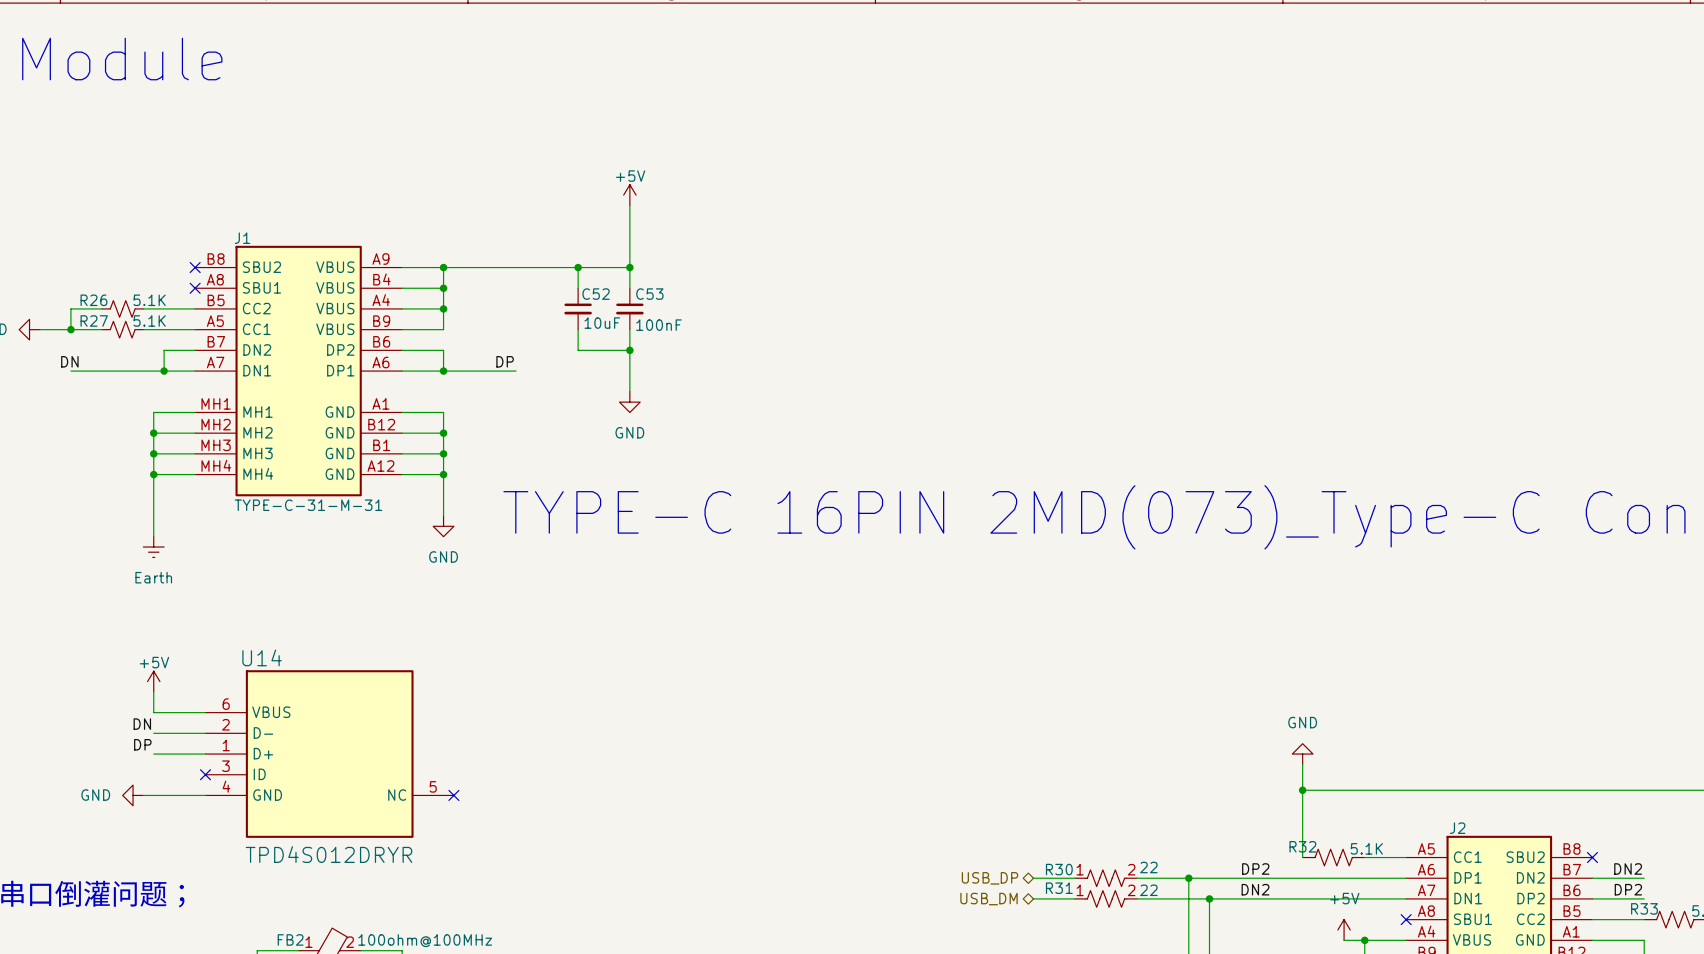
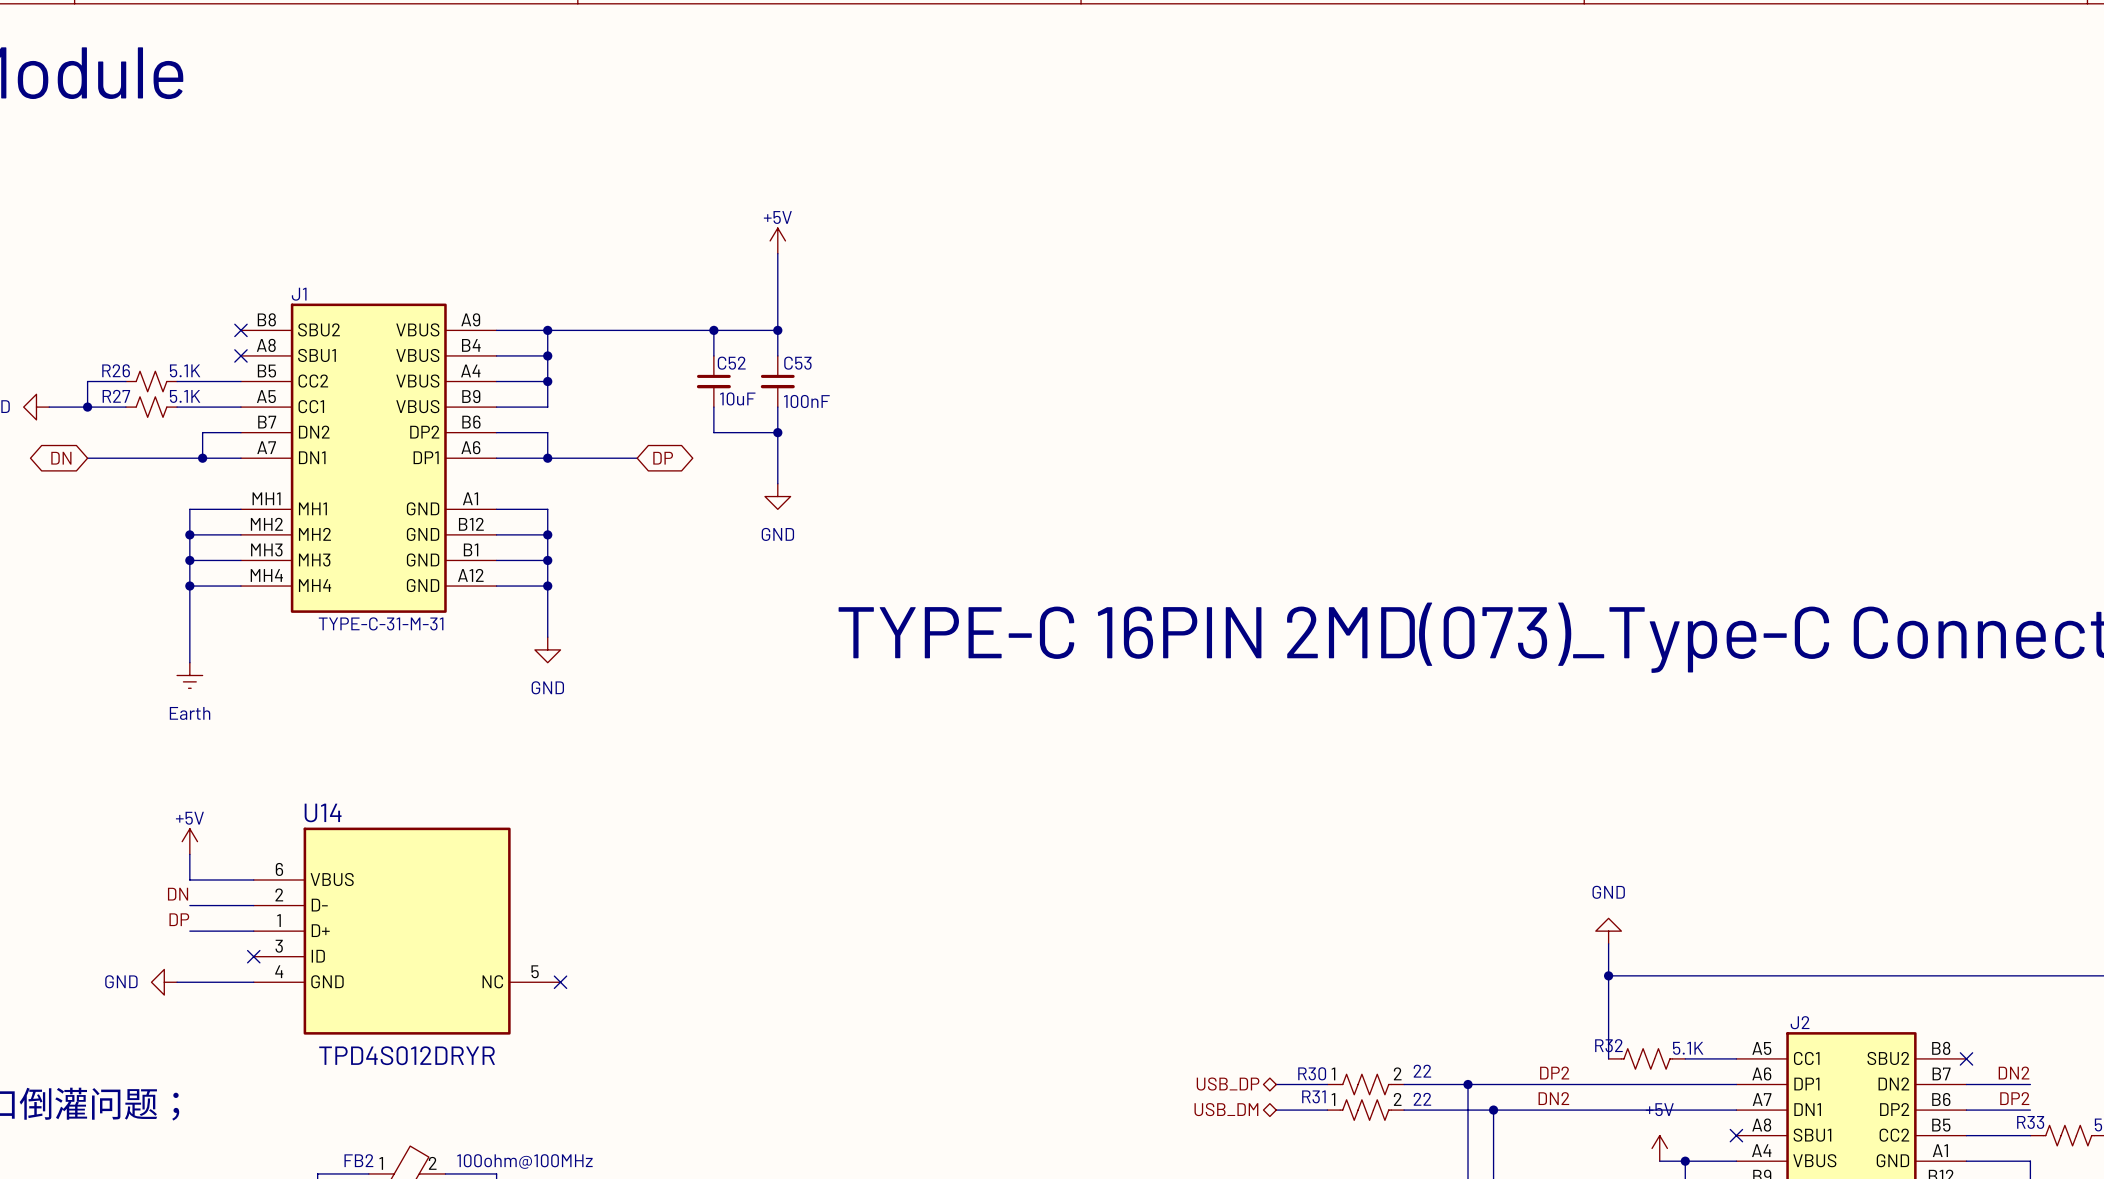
label: DN (69, 361) -> none
label: DP (505, 361) -> none
global label: none -> DN (61, 458)
global label: none -> DP (663, 458)

